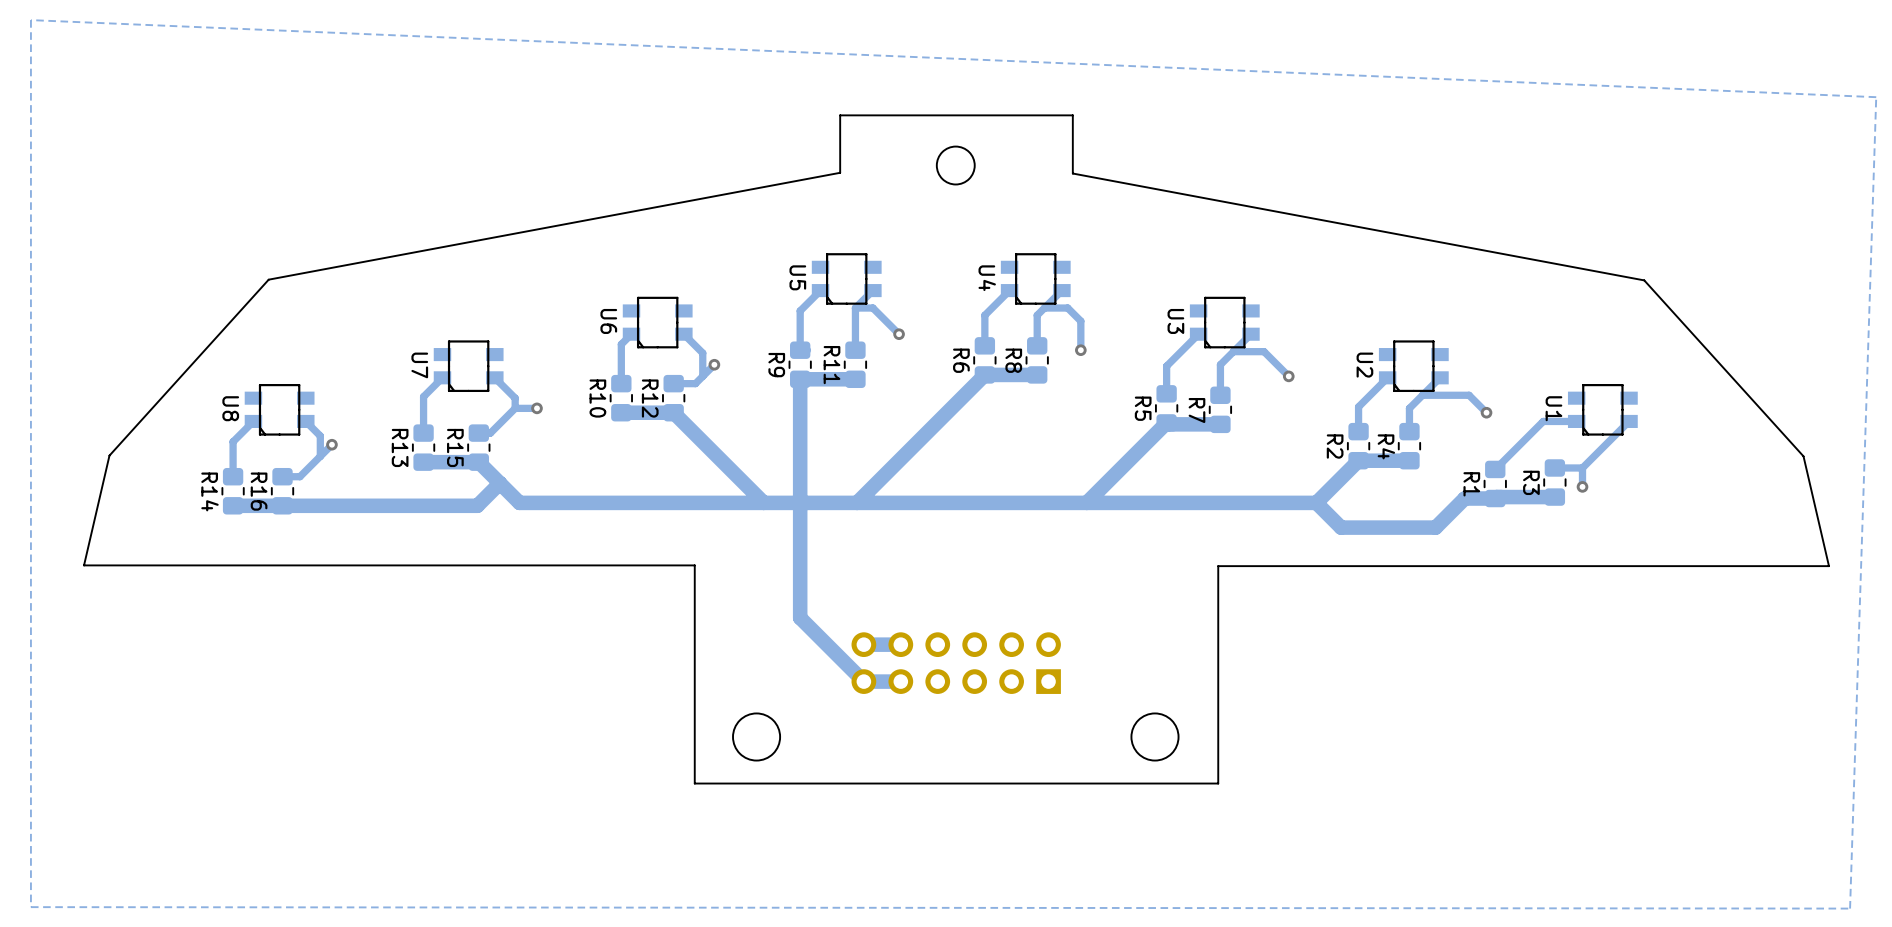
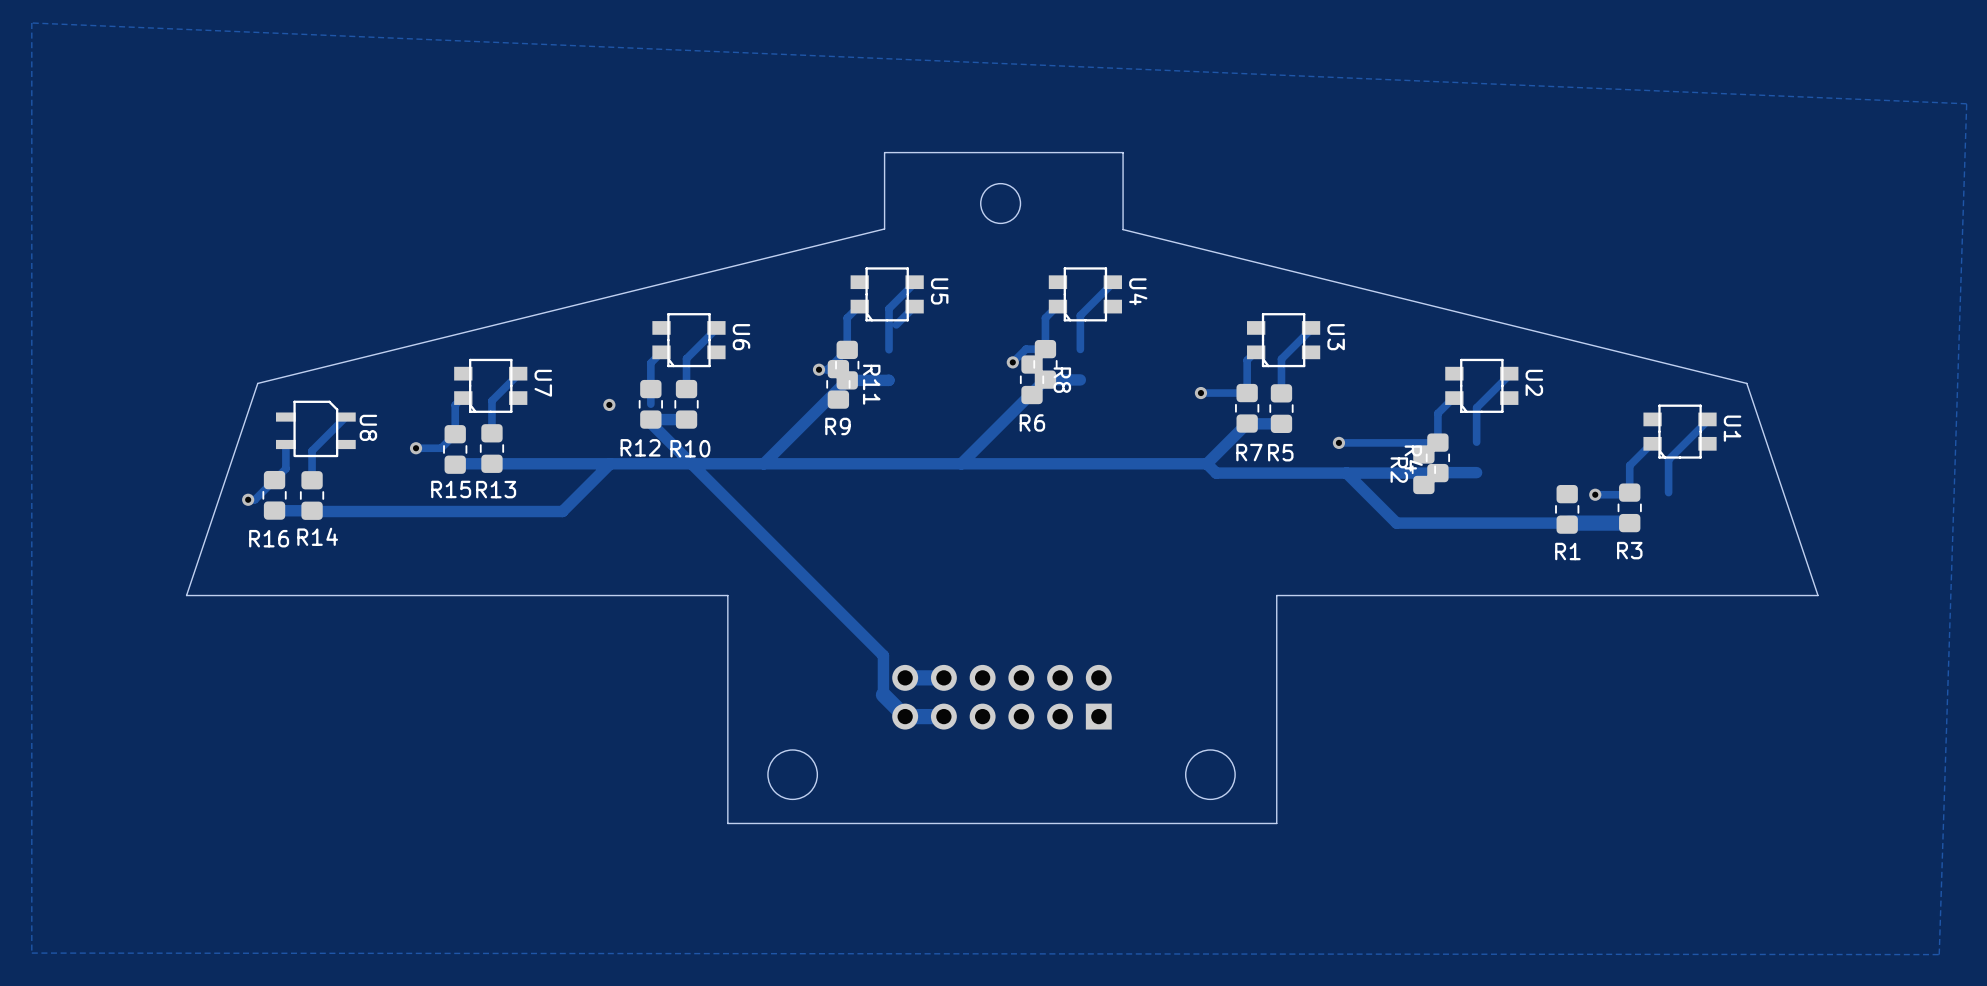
round board edge position: (955, 165) -> (1000, 203)
track: none -> (917, 280) (889, 308) (889, 349)
track: none -> (1115, 280) (1080, 315) (1080, 349)
U5 name position: U5 (797, 277) -> U5 (939, 291)
U4 name position: U4 (987, 278) -> U4 (1138, 291)
track: (820, 290) (800, 310) (800, 350) (807, 350) -> none
track: (1009, 290) (984, 315) (984, 345) -> none
track: (1061, 290) (1037, 315) (1037, 345) -> none
track: none -> (857, 308) (847, 318) (847, 349) (827, 369) (819, 369)
track: none -> (1055, 308) (1045, 318) (1045, 349) (1026, 349) (1012, 362)
track: (1044, 308) (1067, 308) (1080, 321) (1080, 350) -> none
track: none -> (718, 326) (686, 358) (686, 389)
track: none -> (1313, 326) (1281, 359) (1281, 393)
U6 name position: U6 (608, 321) -> U6 (741, 337)
U3 name position: U3 (1175, 321) -> U3 (1336, 337)
track: (683, 334) (702, 353) (702, 376) -> none
track: (899, 334) (872, 308) (855, 308) (855, 350) -> none
via: (899, 334) -> none
track: (1198, 334) (1166, 366) (1166, 393) -> none
track: (1250, 334) (1220, 364) (1220, 395) -> none
track: none -> (1253, 353) (1247, 360) (1247, 393) (1200, 393)
via: none -> (1012, 362)
via: none -> (819, 369)
via: (1080, 350) -> none
track: (1233, 351) (1264, 351) (1288, 376) -> none
track: none -> (520, 372) (491, 400) (491, 433)
track: none -> (1511, 372) (1476, 407) (1476, 442)
track: none -> (888, 380) (847, 380) (763, 463)
R6 name rotation: 0° (961, 360) -> 90° counterclockwise (1032, 422)
R6 name position: R6 (961, 360) -> R6 (1032, 422)
track: none -> (1080, 379) (1045, 379) (961, 463)
R8 position: (1037, 360) -> (1045, 364)
track: (714, 364) (695, 383) (673, 383) -> none
via: (714, 364) -> none
R11 position: (855, 364) -> (847, 365)
U7 name position: U7 (419, 365) -> U7 (543, 383)
R9 name rotation: 0° (776, 365) -> 90° counterclockwise (837, 426)
R9 name position: R9 (776, 365) -> R9 (837, 426)
U2 name position: U2 (1364, 365) -> U2 (1534, 382)
via: none -> (1200, 393)
track: (1037, 374) (984, 374) (856, 502) -> none
via position: (1288, 376) -> (1338, 442)
track: (442, 377) (423, 396) (423, 433) -> none
track: (494, 377) (515, 398) (515, 408) -> none
track: (1387, 377) (1358, 406) (1358, 431) -> none
track: (1440, 377) (1409, 408) (1409, 431) -> none
track: none -> (460, 399) (455, 405) (455, 434) (441, 448) (416, 448)
track: (855, 379) (800, 379) (800, 617) (843, 660) -> (686, 419) (650, 419) (650, 423) (883, 655) (883, 694)
track: none -> (1451, 399) (1437, 413) (1437, 442) (1338, 442)
U8 footprint: [244, 384, 315, 436] -> [275, 400, 356, 458]
track: none -> (345, 417) (312, 450) (312, 480)
track: (1422, 395) (1469, 395) (1486, 412) -> none
track: none -> (1709, 417) (1668, 459) (1668, 492)
R10 name rotation: 0° (597, 398) -> 90° counterclockwise (690, 448)
R10 name position: R10 (597, 398) -> R10 (690, 448)
R10 position: (621, 398) -> (686, 404)
R12 name rotation: 0° (650, 398) -> 90° counterclockwise (640, 447)
R12 position: (673, 398) -> (650, 404)
track: none -> (1281, 423) (1247, 423) (1206, 463)
U8 name position: U8 (230, 408) -> U8 (368, 427)
track: (515, 408) (490, 433) (478, 433) -> none
track: (536, 408) (515, 408) -> none
via position: (536, 408) -> (609, 404)
R5 name rotation: 0° (1143, 408) -> 90° counterclockwise (1280, 452)
R5 name position: R5 (1143, 408) -> R5 (1280, 452)
R5 position: (1166, 408) -> (1281, 408)
U1 name position: U1 (1553, 408) -> U1 (1732, 428)
R7 position: (1220, 409) -> (1247, 408)
R7 name rotation: 0° (1196, 410) -> 90° counterclockwise (1249, 452)
track: (621, 412) (673, 412) (763, 502) -> none
via: (1486, 412) -> none
track: (253, 421) (233, 441) (233, 476) -> none
track: (305, 421) (320, 435) (320, 456) -> none
track: (1576, 421) (1543, 421) (1495, 469) -> none
track: (1629, 421) (1582, 467) -> none
track: none -> (285, 444) (285, 468) (254, 499) (248, 499)
track: none -> (1650, 445) (1629, 465) (1629, 492) (1627, 494) (1595, 494)
track: (1220, 424) (1166, 422) (1086, 502) -> none
via: none -> (416, 448)
track: none -> (610, 463) (562, 511) (274, 510)
track: none -> (1206, 463) (455, 464)
track: none -> (1206, 463) (1216, 473) (1476, 472)
track: (331, 444) (299, 476) (282, 476) -> none
via: (331, 444) -> none
R4 position: (1409, 446) -> (1437, 457)
R13 name rotation: 0° (400, 447) -> 90° counterclockwise (496, 489)
R13 position: (423, 447) -> (491, 448)
R15 name rotation: 0° (455, 447) -> 90° counterclockwise (451, 489)
R15 position: (478, 447) -> (455, 449)
track: (1409, 460) (1358, 460) (1316, 502) -> none
track: (423, 462) (478, 462) (519, 502) (1316, 502) -> none
track: (1582, 467) (1554, 467) -> none
track: (1582, 467) (1582, 486) -> none
via: none -> (1595, 494)
via: none -> (248, 499)
R3 name rotation: 0° (1531, 482) -> 90° counterclockwise (1629, 550)
R3 name position: R3 (1531, 482) -> R3 (1629, 550)
track: (499, 483) (477, 505) (233, 505) -> none
R1 name rotation: 0° (1471, 484) -> 90° counterclockwise (1567, 551)
R1 name position: R1 (1471, 484) -> R1 (1567, 551)
via: (1582, 486) -> none
R14 name rotation: 0° (209, 491) -> 90° counterclockwise (317, 536)
R14 position: (233, 491) -> (312, 495)
R16 name rotation: 0° (259, 491) -> 90° counterclockwise (269, 538)
R16 position: (282, 491) -> (274, 495)
track: (1496, 497) (1464, 498) (1435, 527) (1341, 527) (1316, 502) -> (1568, 523) (1396, 523) (1346, 473)
board edge: (1734, 566) (1828, 566) (1803, 456) (1644, 280) (1072, 173) (1072, 115) (840, 115) (840, 172) (268, 279) (109, 455) (84, 565) (694, 566) -> (1818, 595) (1746, 383) (1123, 229) (1123, 152) (884, 152) (884, 228) (257, 383) (186, 595) (727, 595)

